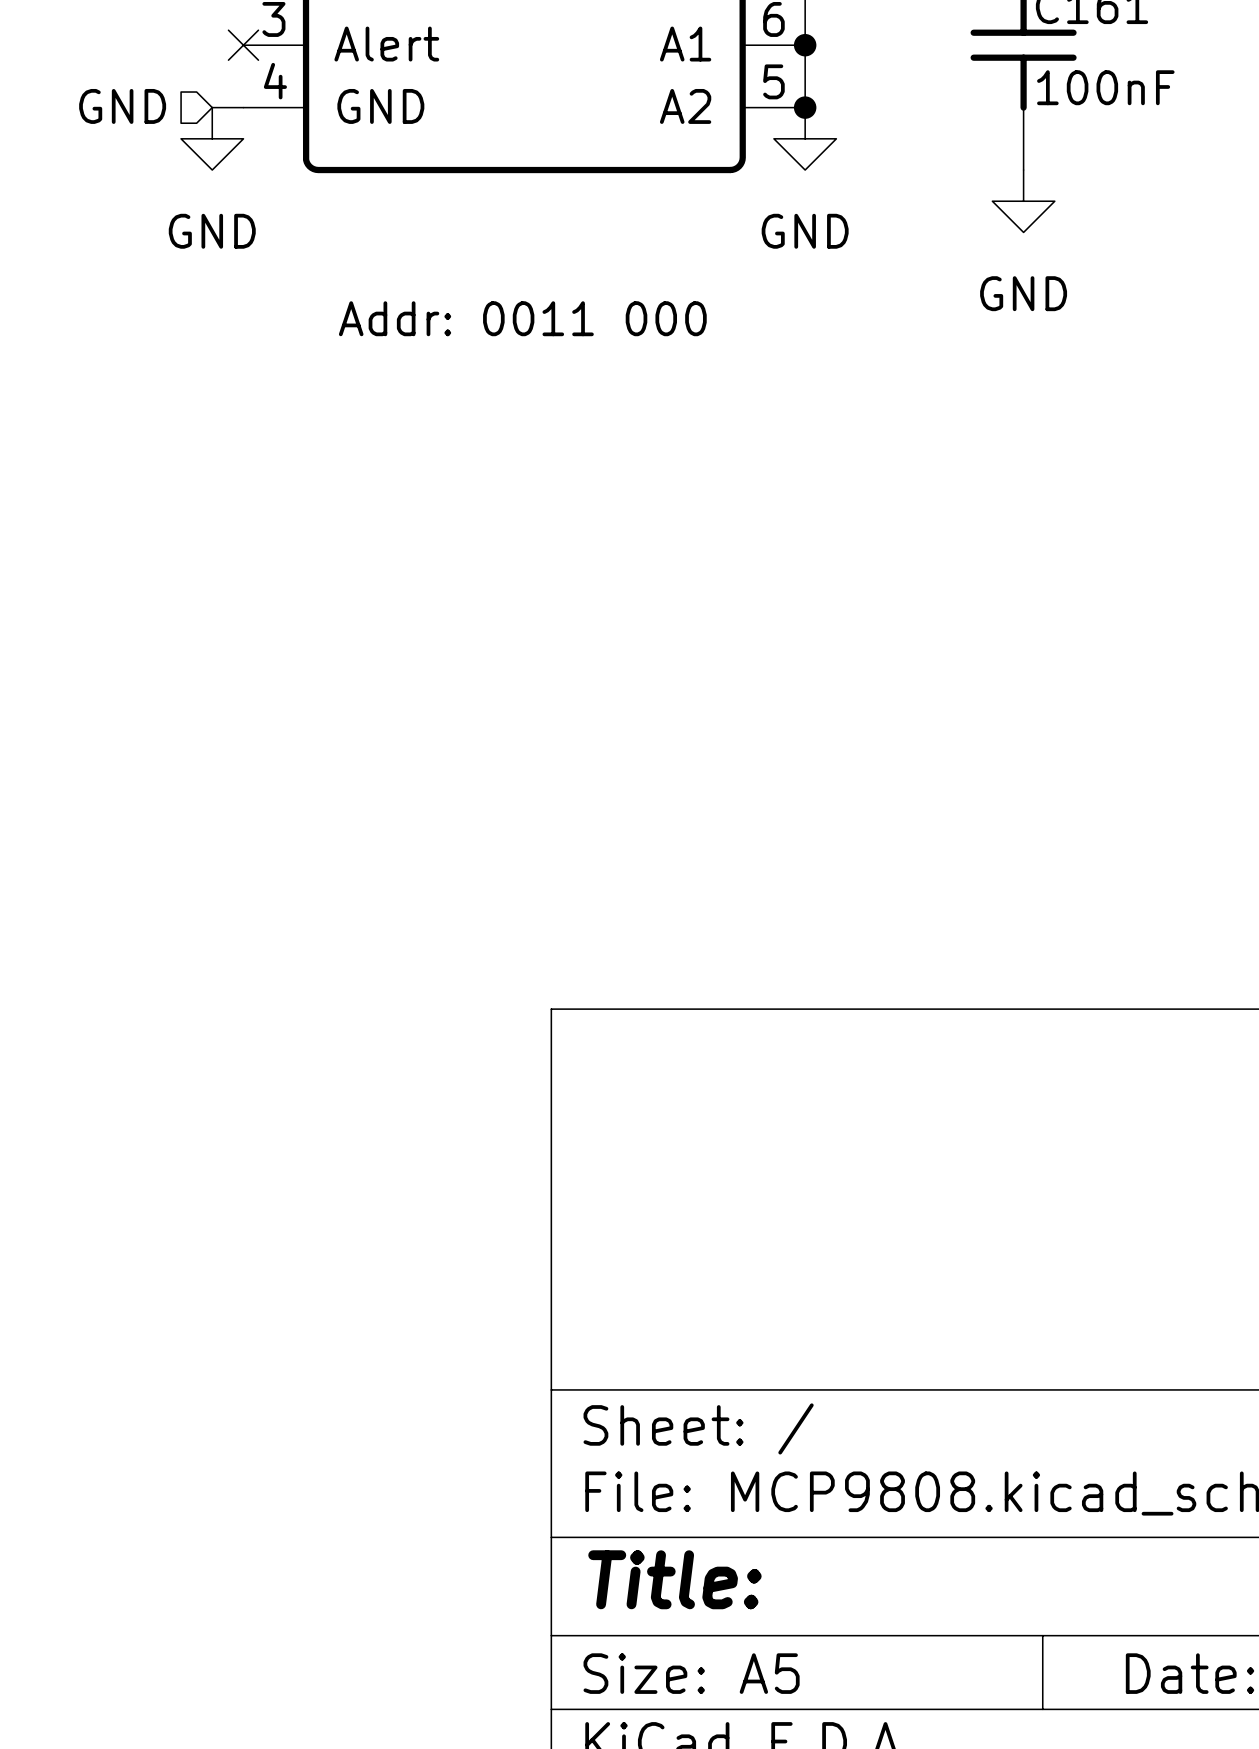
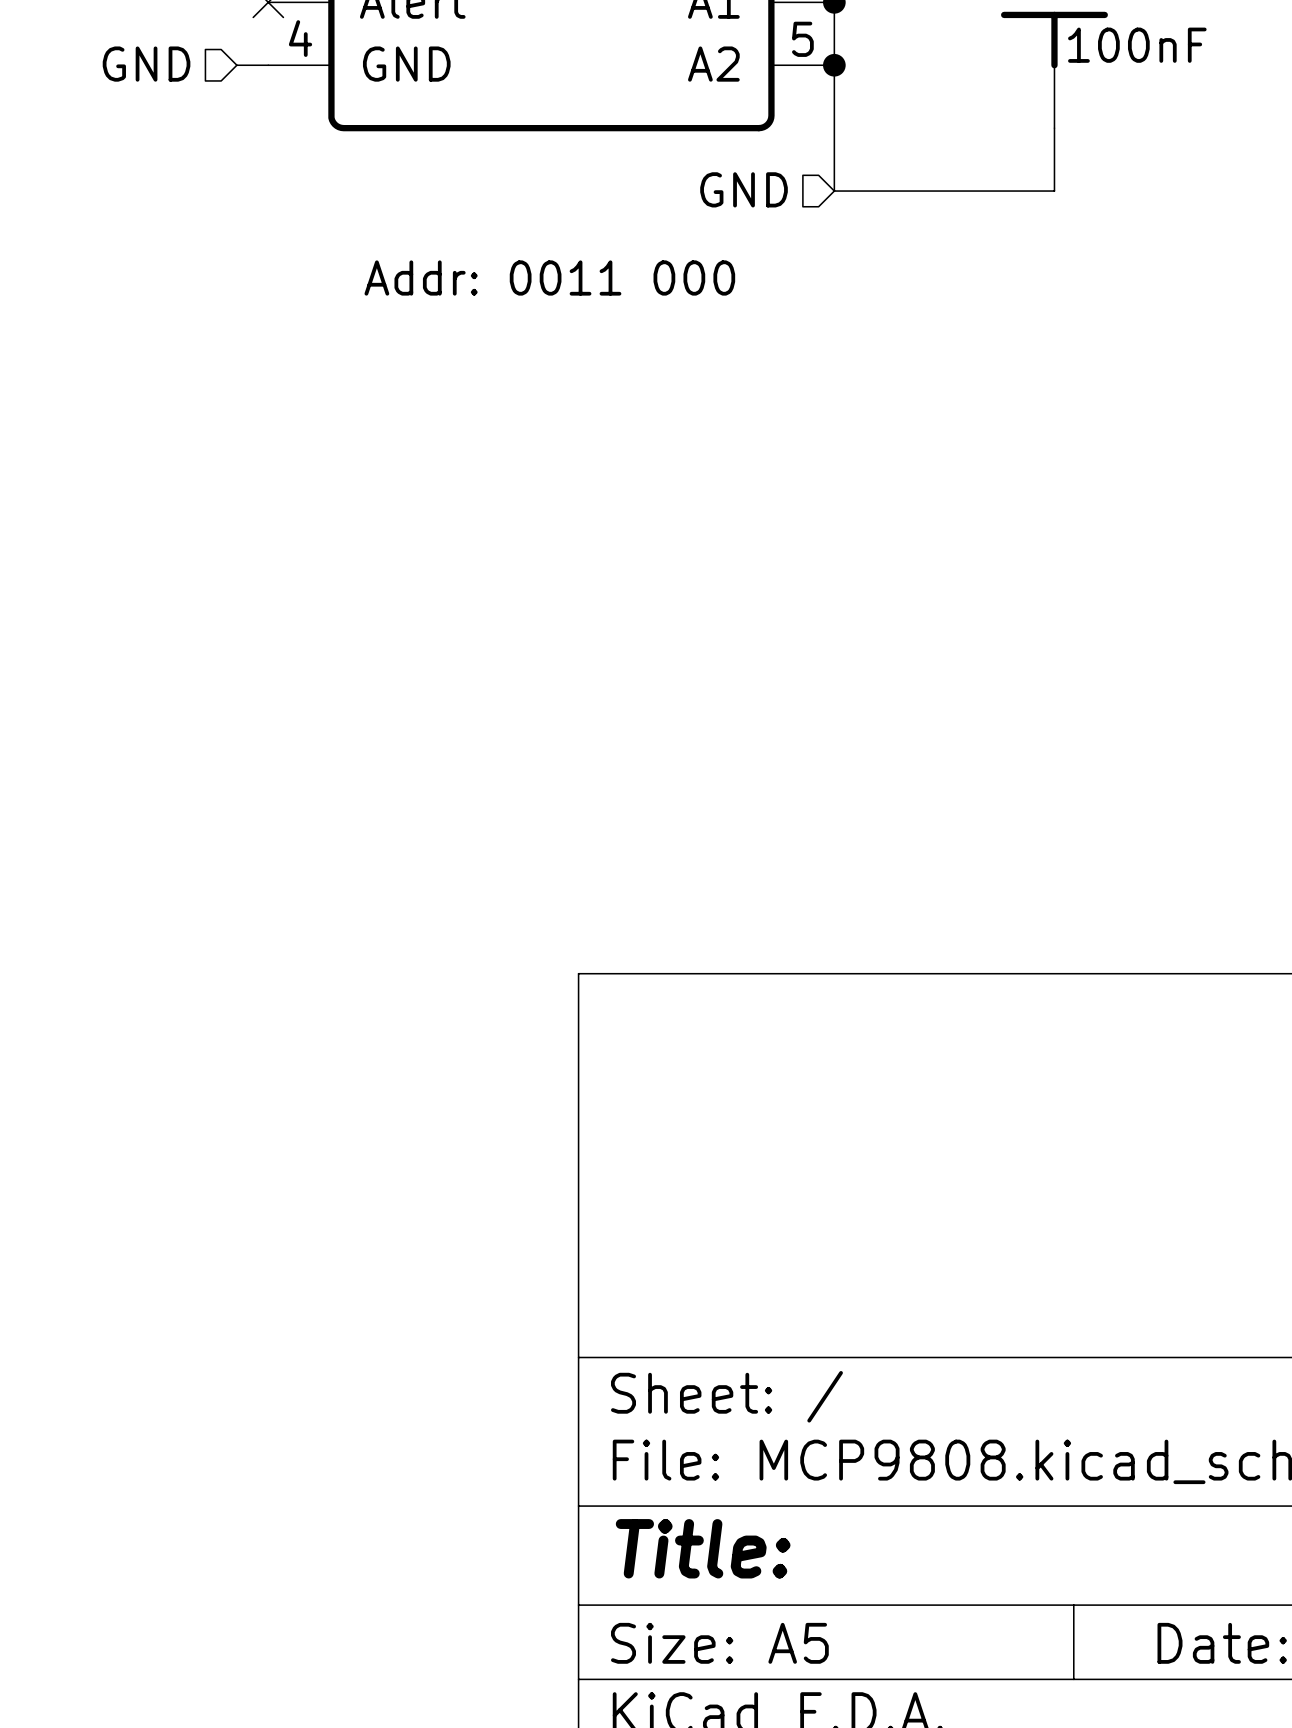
wire: none -> (834, 65) (834, 191) (1054, 191) (1054, 128)
power symbol: GND (212, 138) -> none
power symbol: GND (805, 138) -> none
power symbol: GND (1023, 201) -> none
hierarchical label: none -> GND (744, 189)

